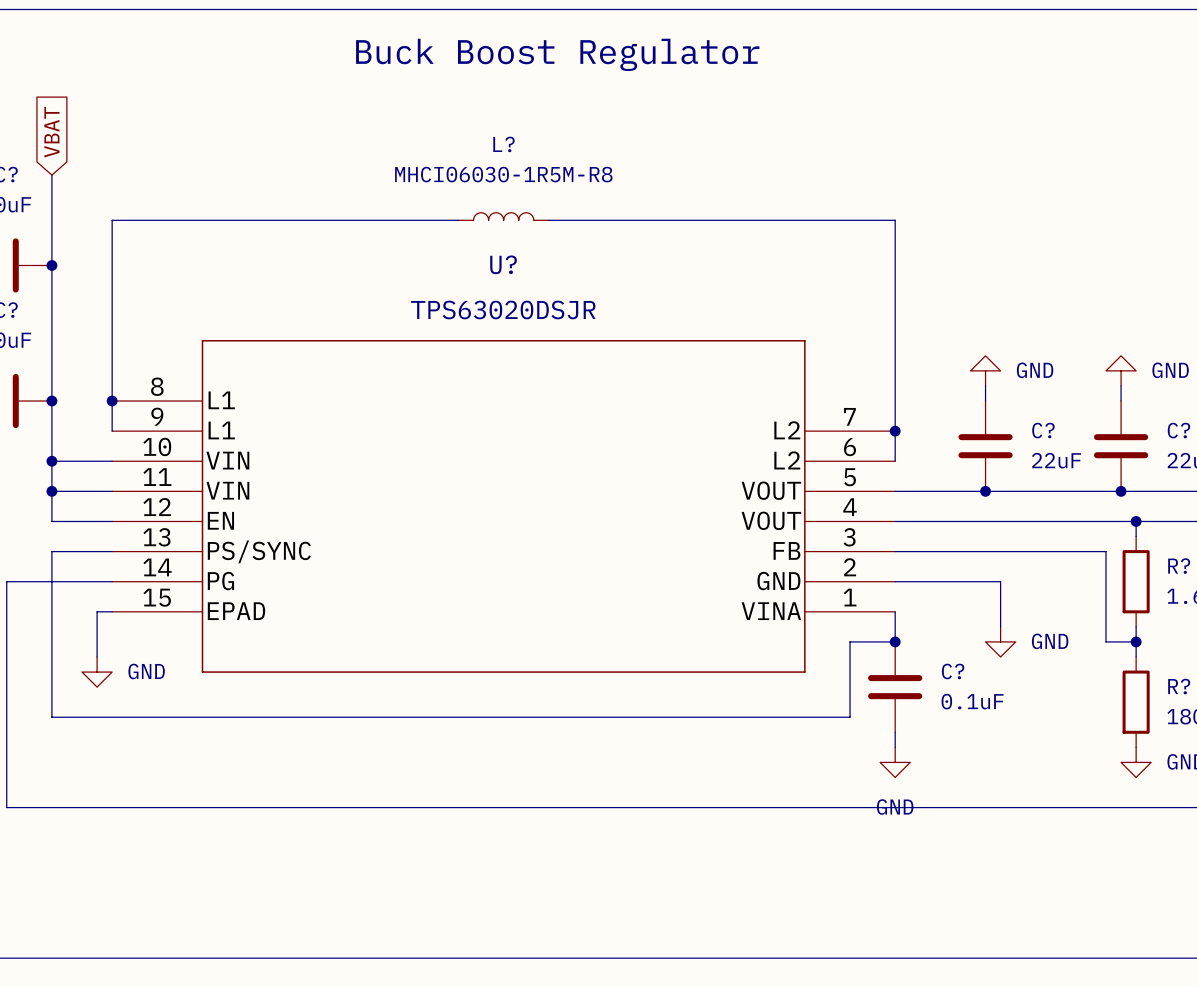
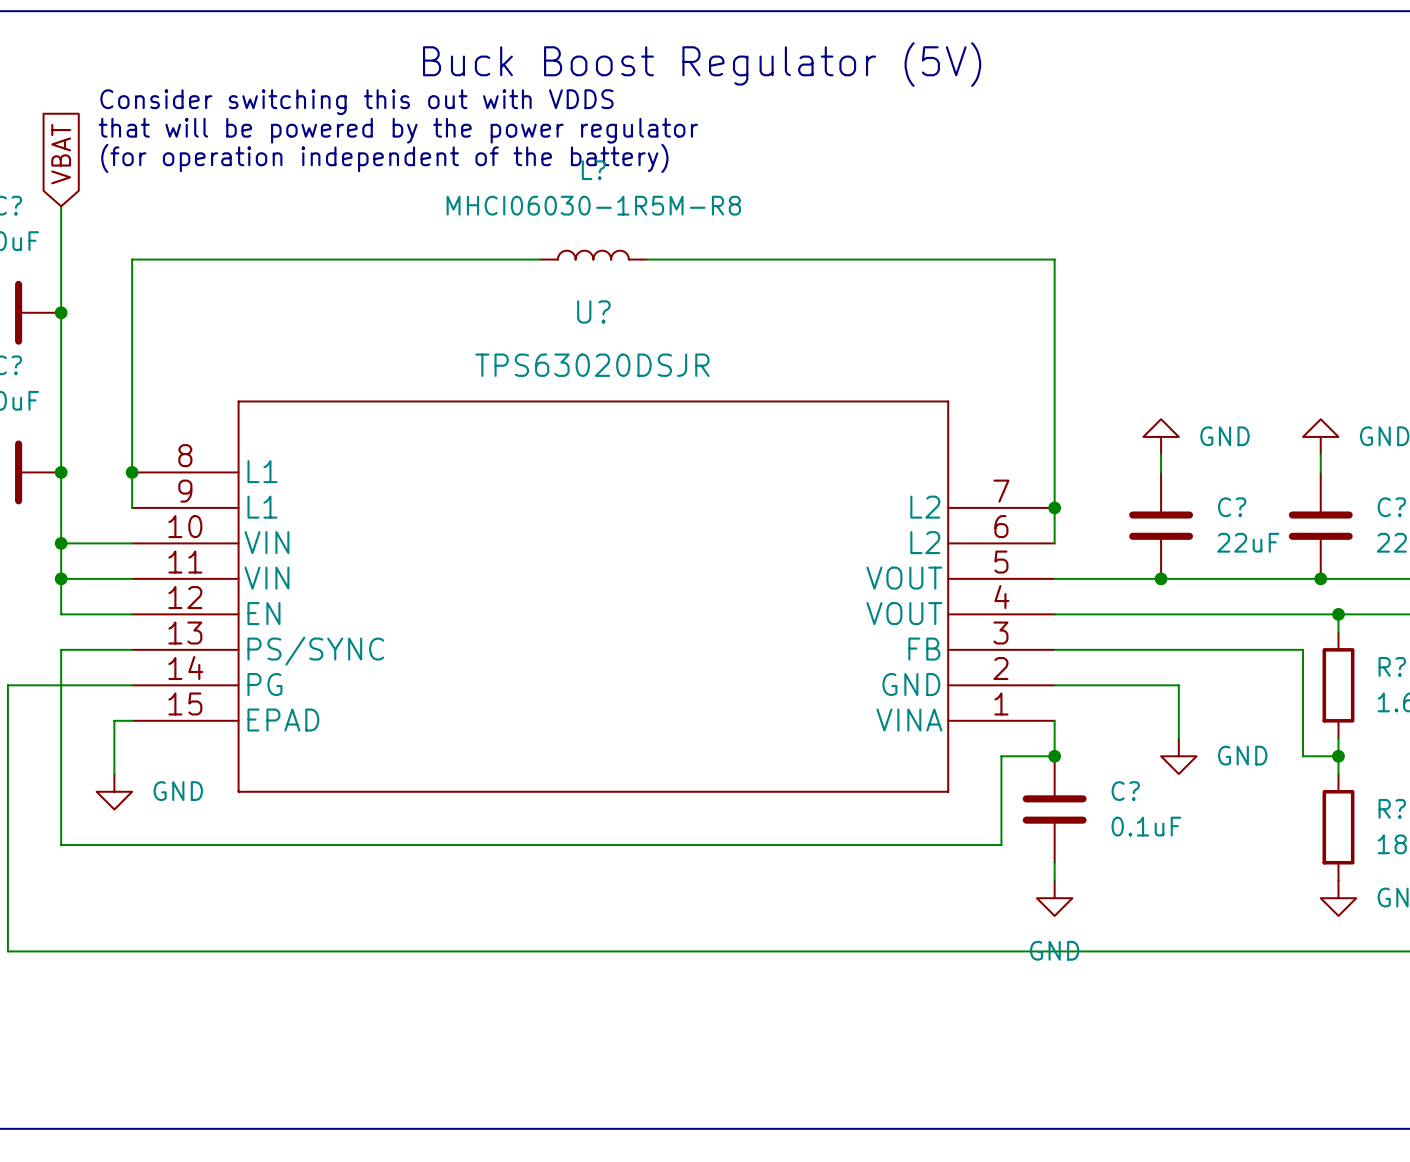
text: Buck Boost Regulator (557, 54) -> Buck Boost Regulator (5V) (702, 64)
text: none -> Consider switching this out with VDDS (356, 102)
text: none -> that will be powered by the power regulator (398, 130)
text: none -> (for operation independent of the battery) (384, 158)

